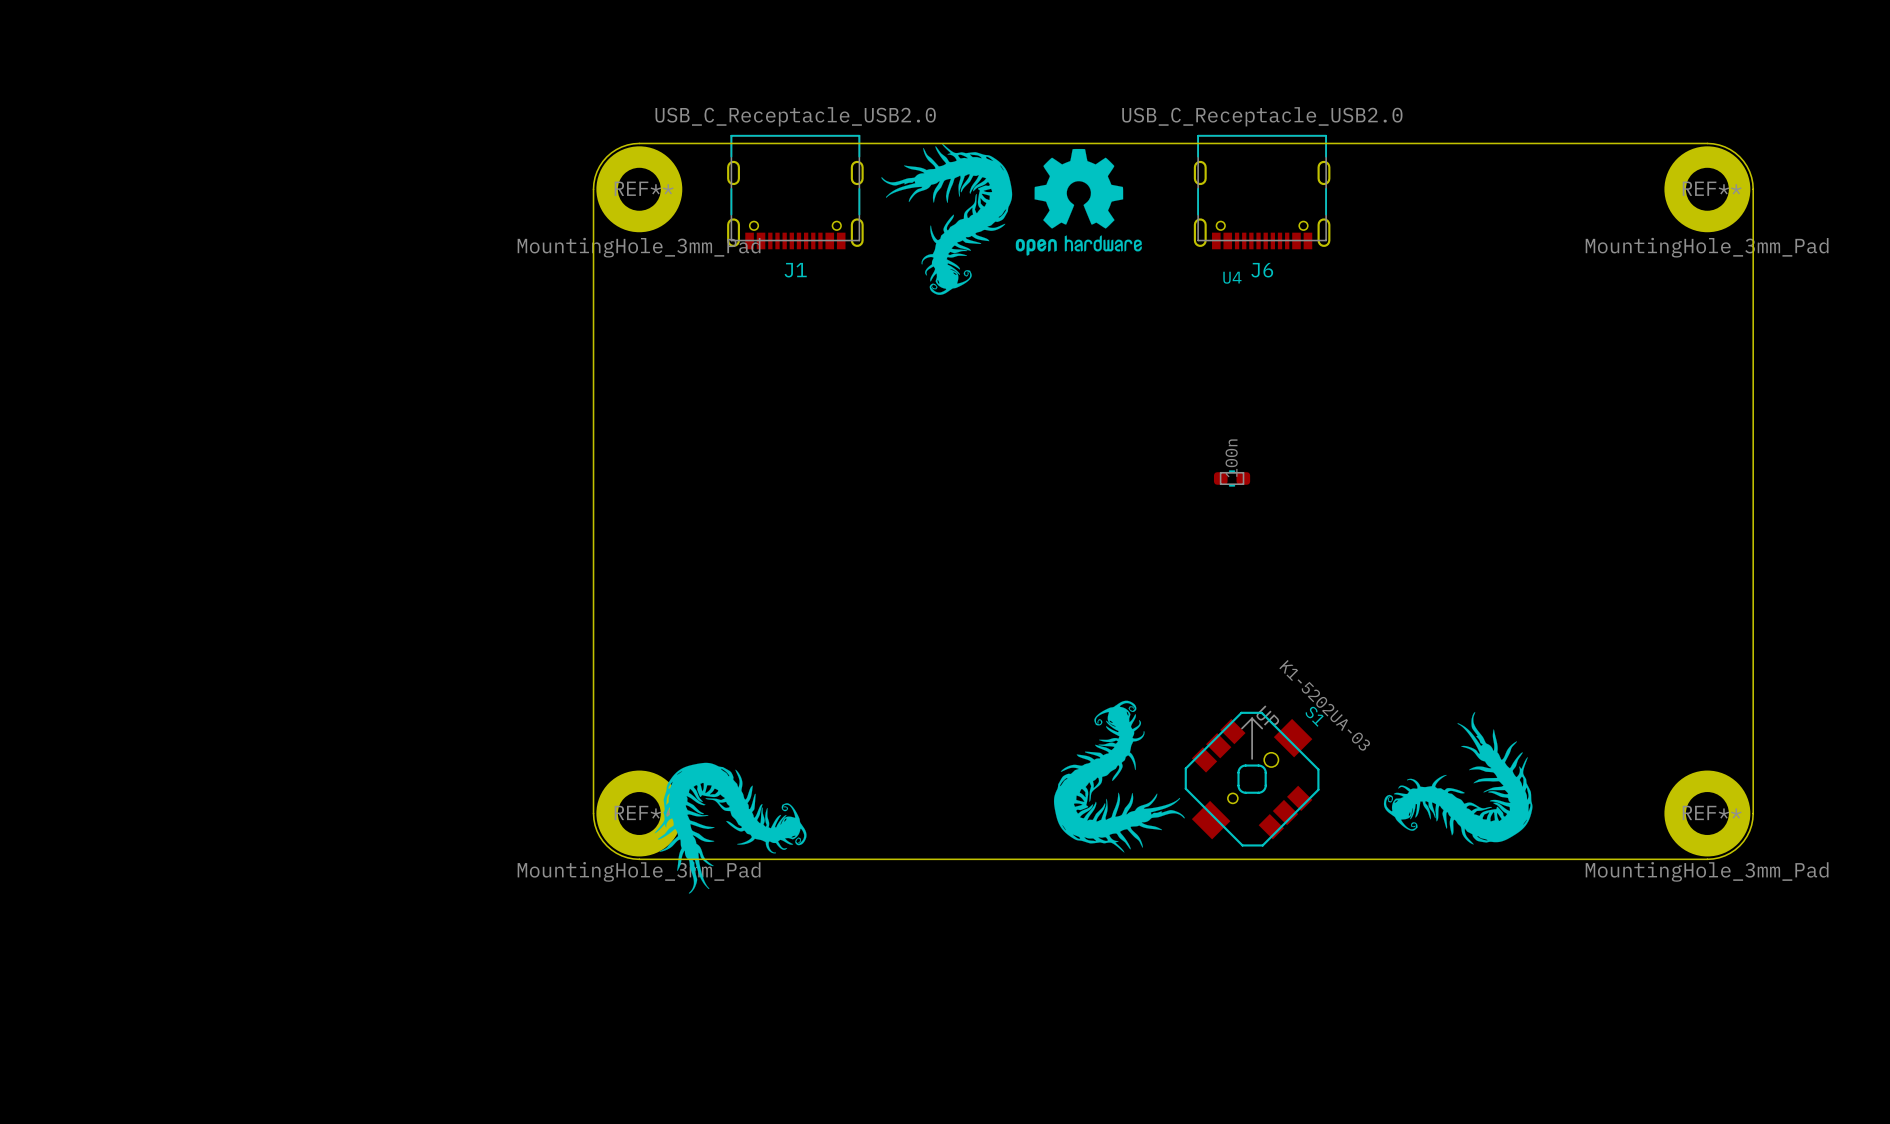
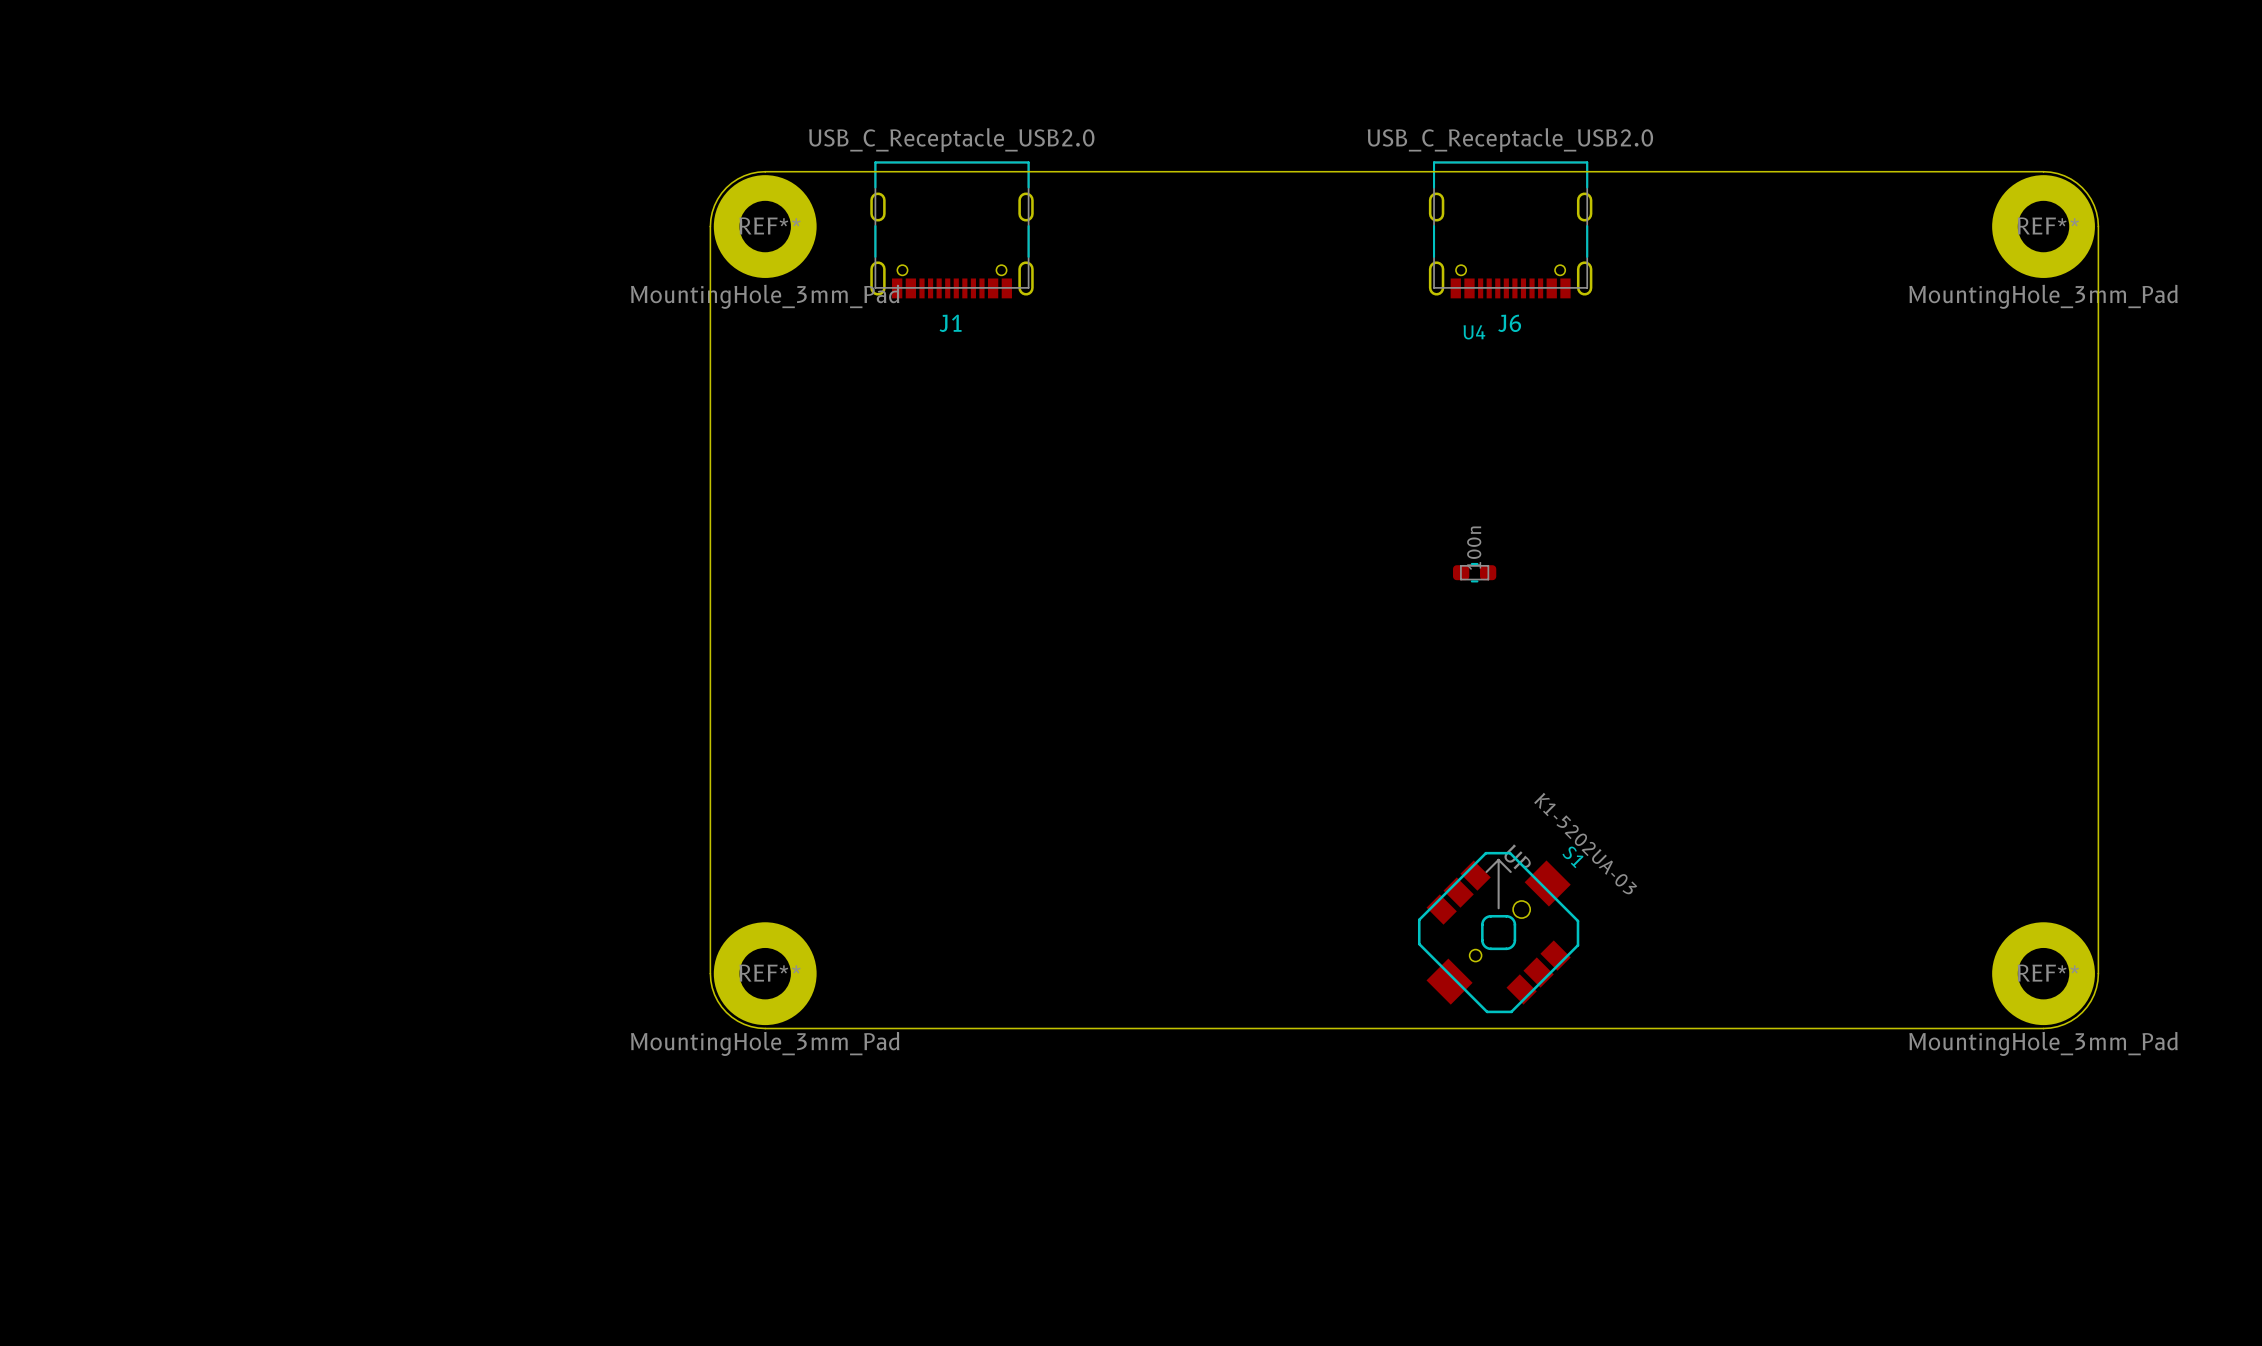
drawing: [881, 143, 1142, 295] -> none
drawing: [1053, 700, 1185, 853] -> none
drawing: [1383, 712, 1533, 845] -> none
drawing: [654, 762, 807, 894] -> none

